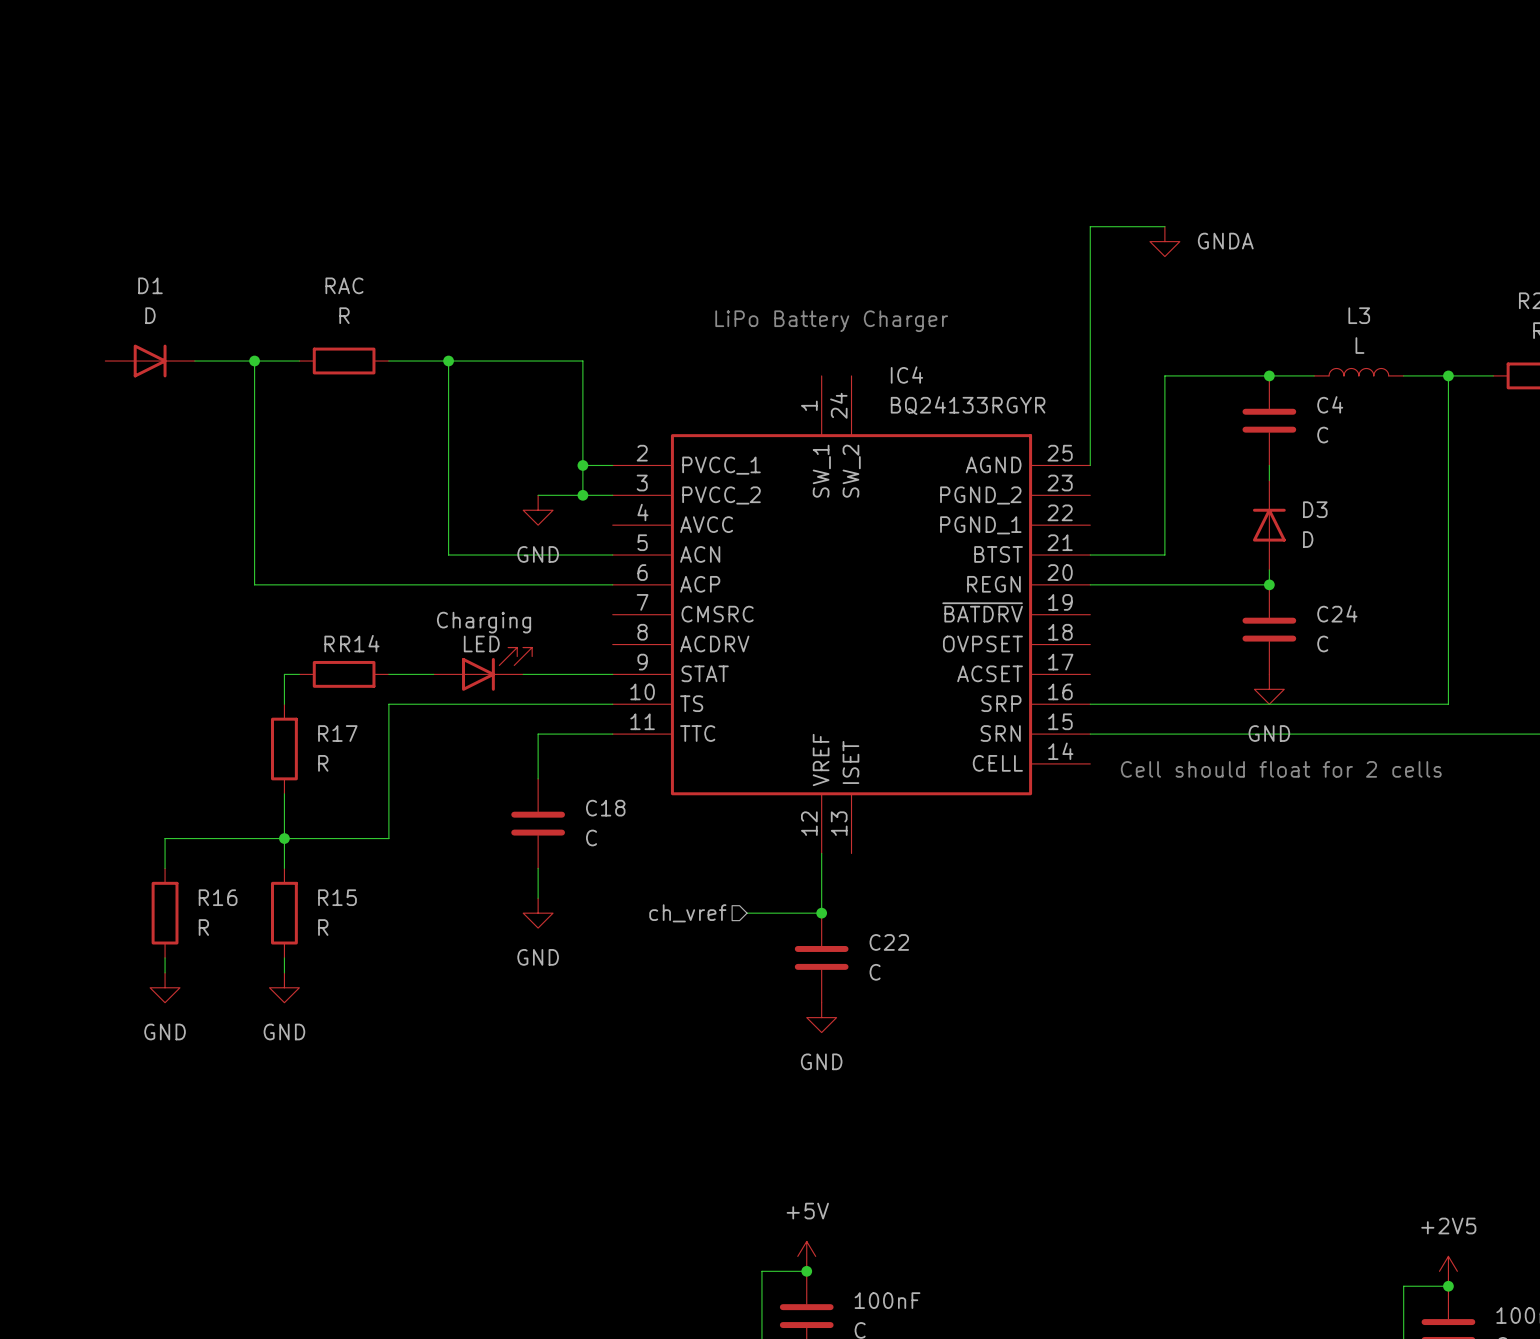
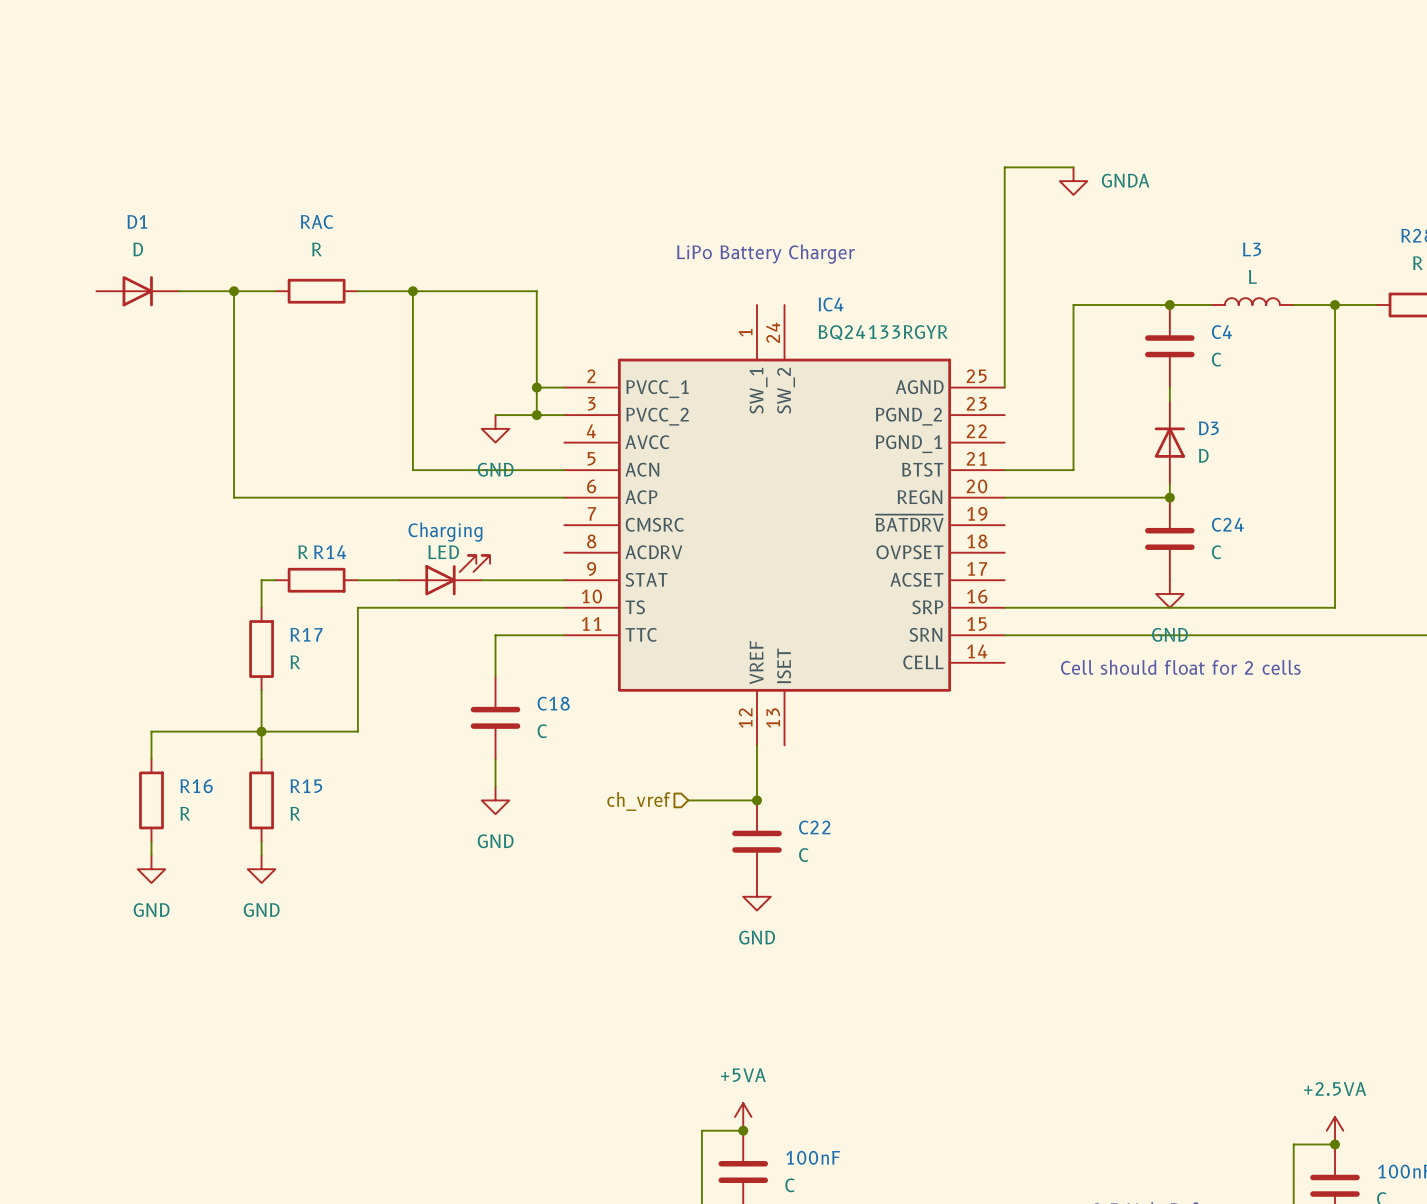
power symbol: +5V (806, 1256) -> +5VA (743, 1116)
power symbol: +2V5 (1448, 1271) -> +2.5VA (1335, 1130)

